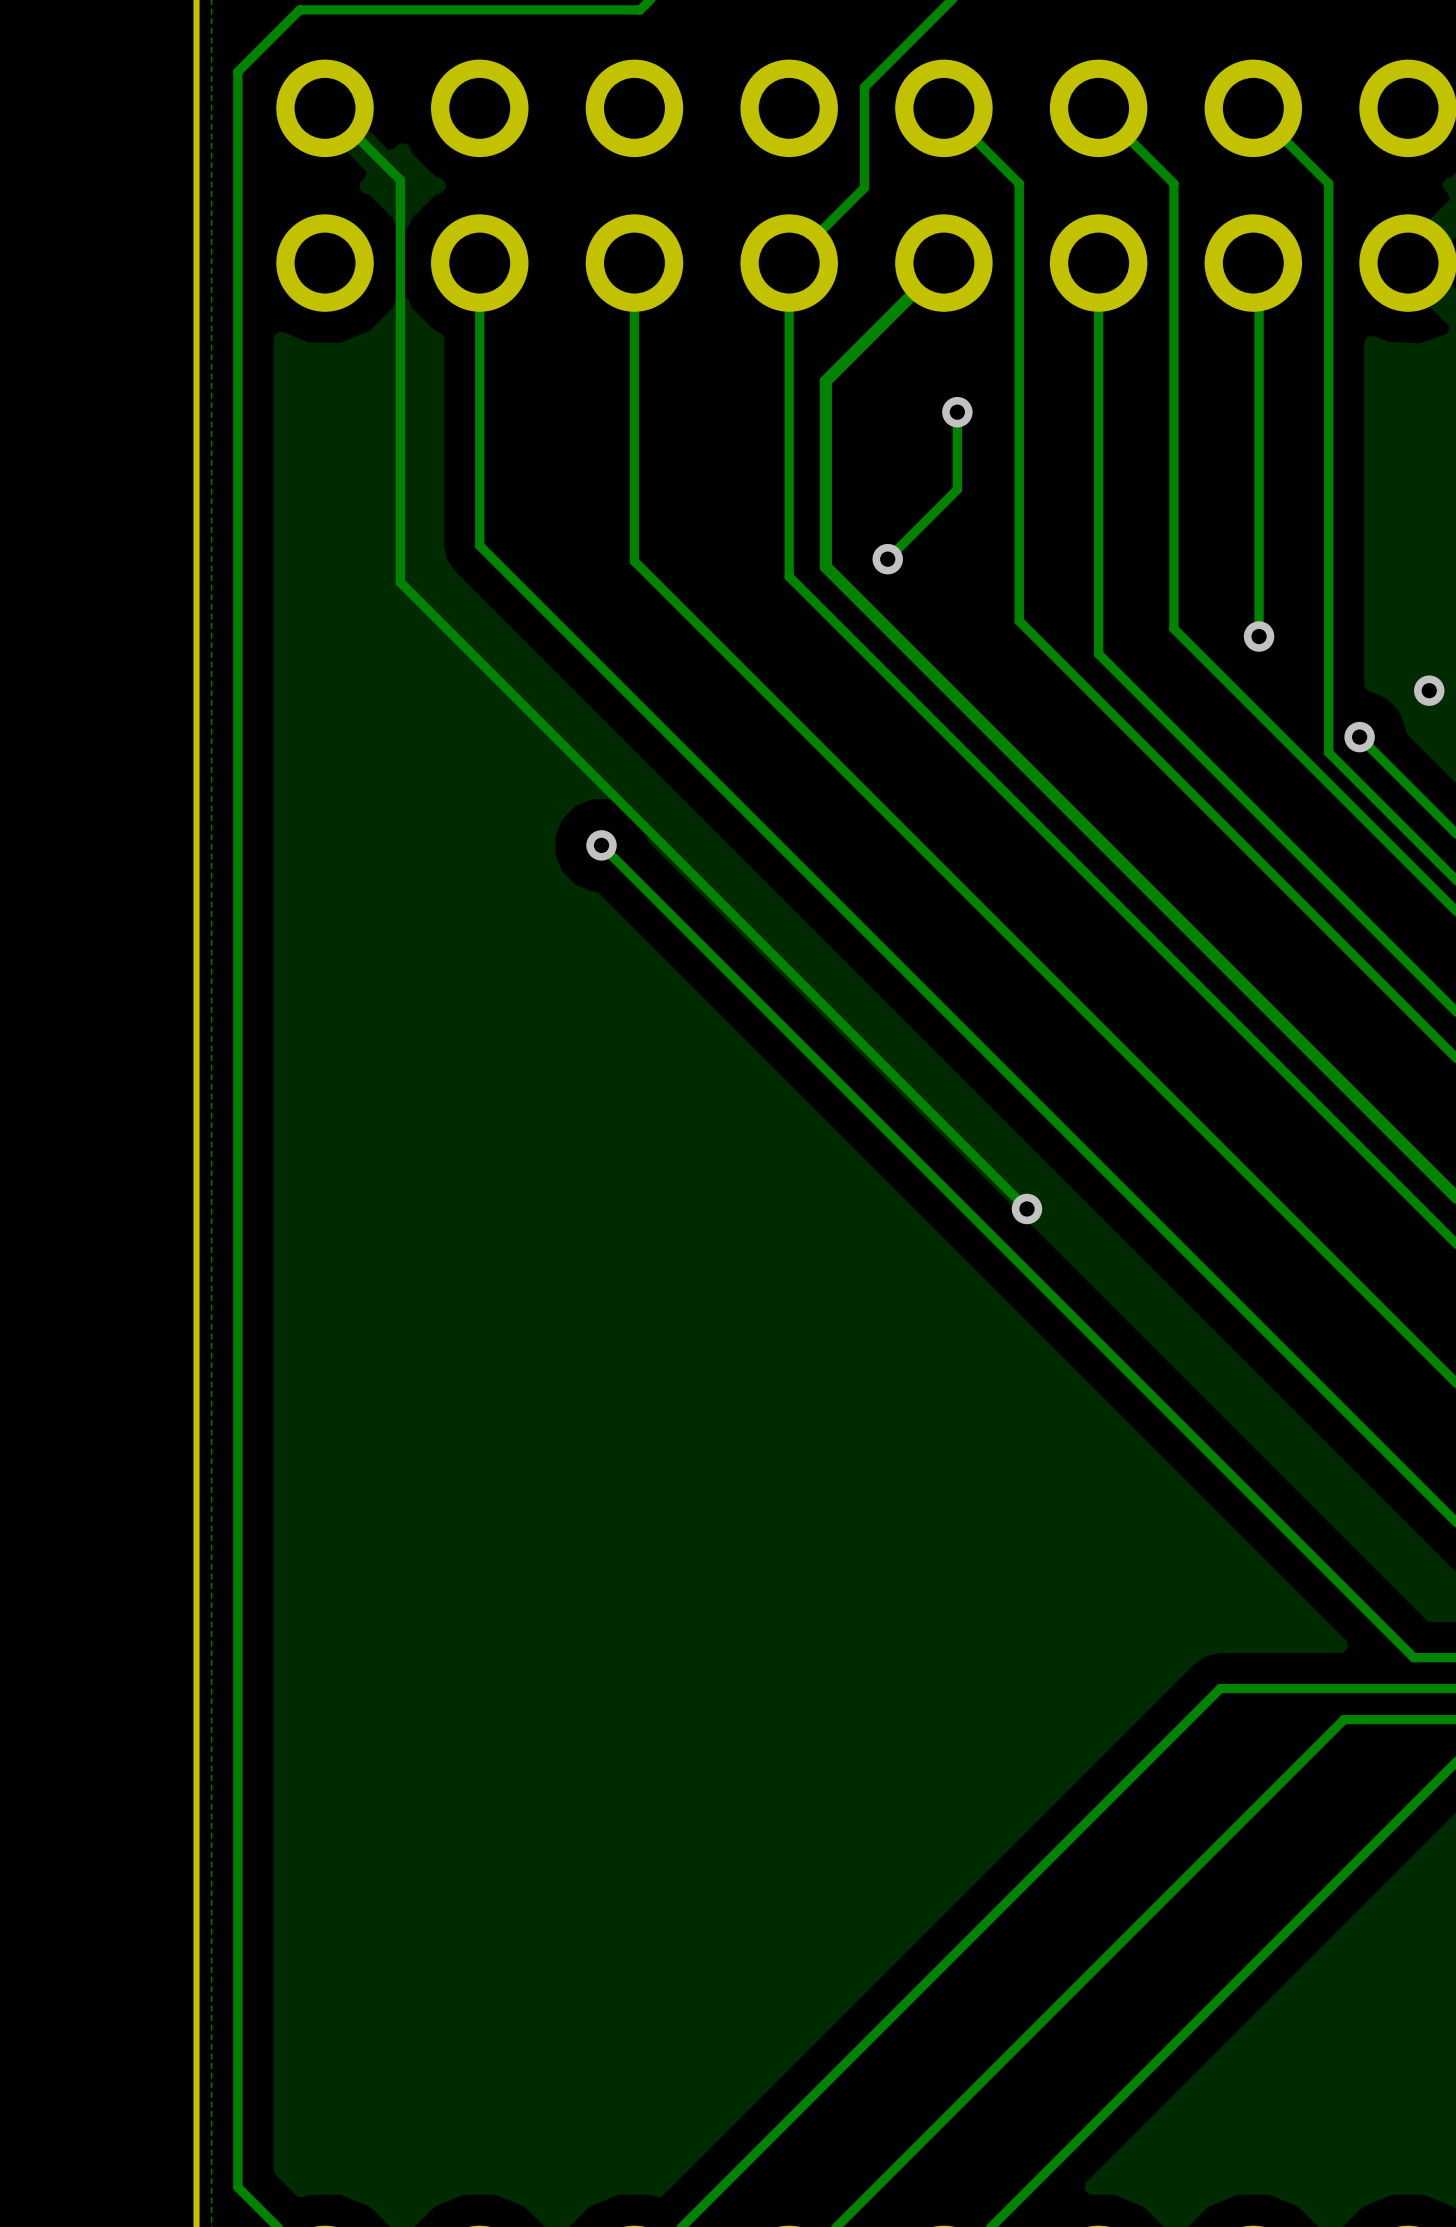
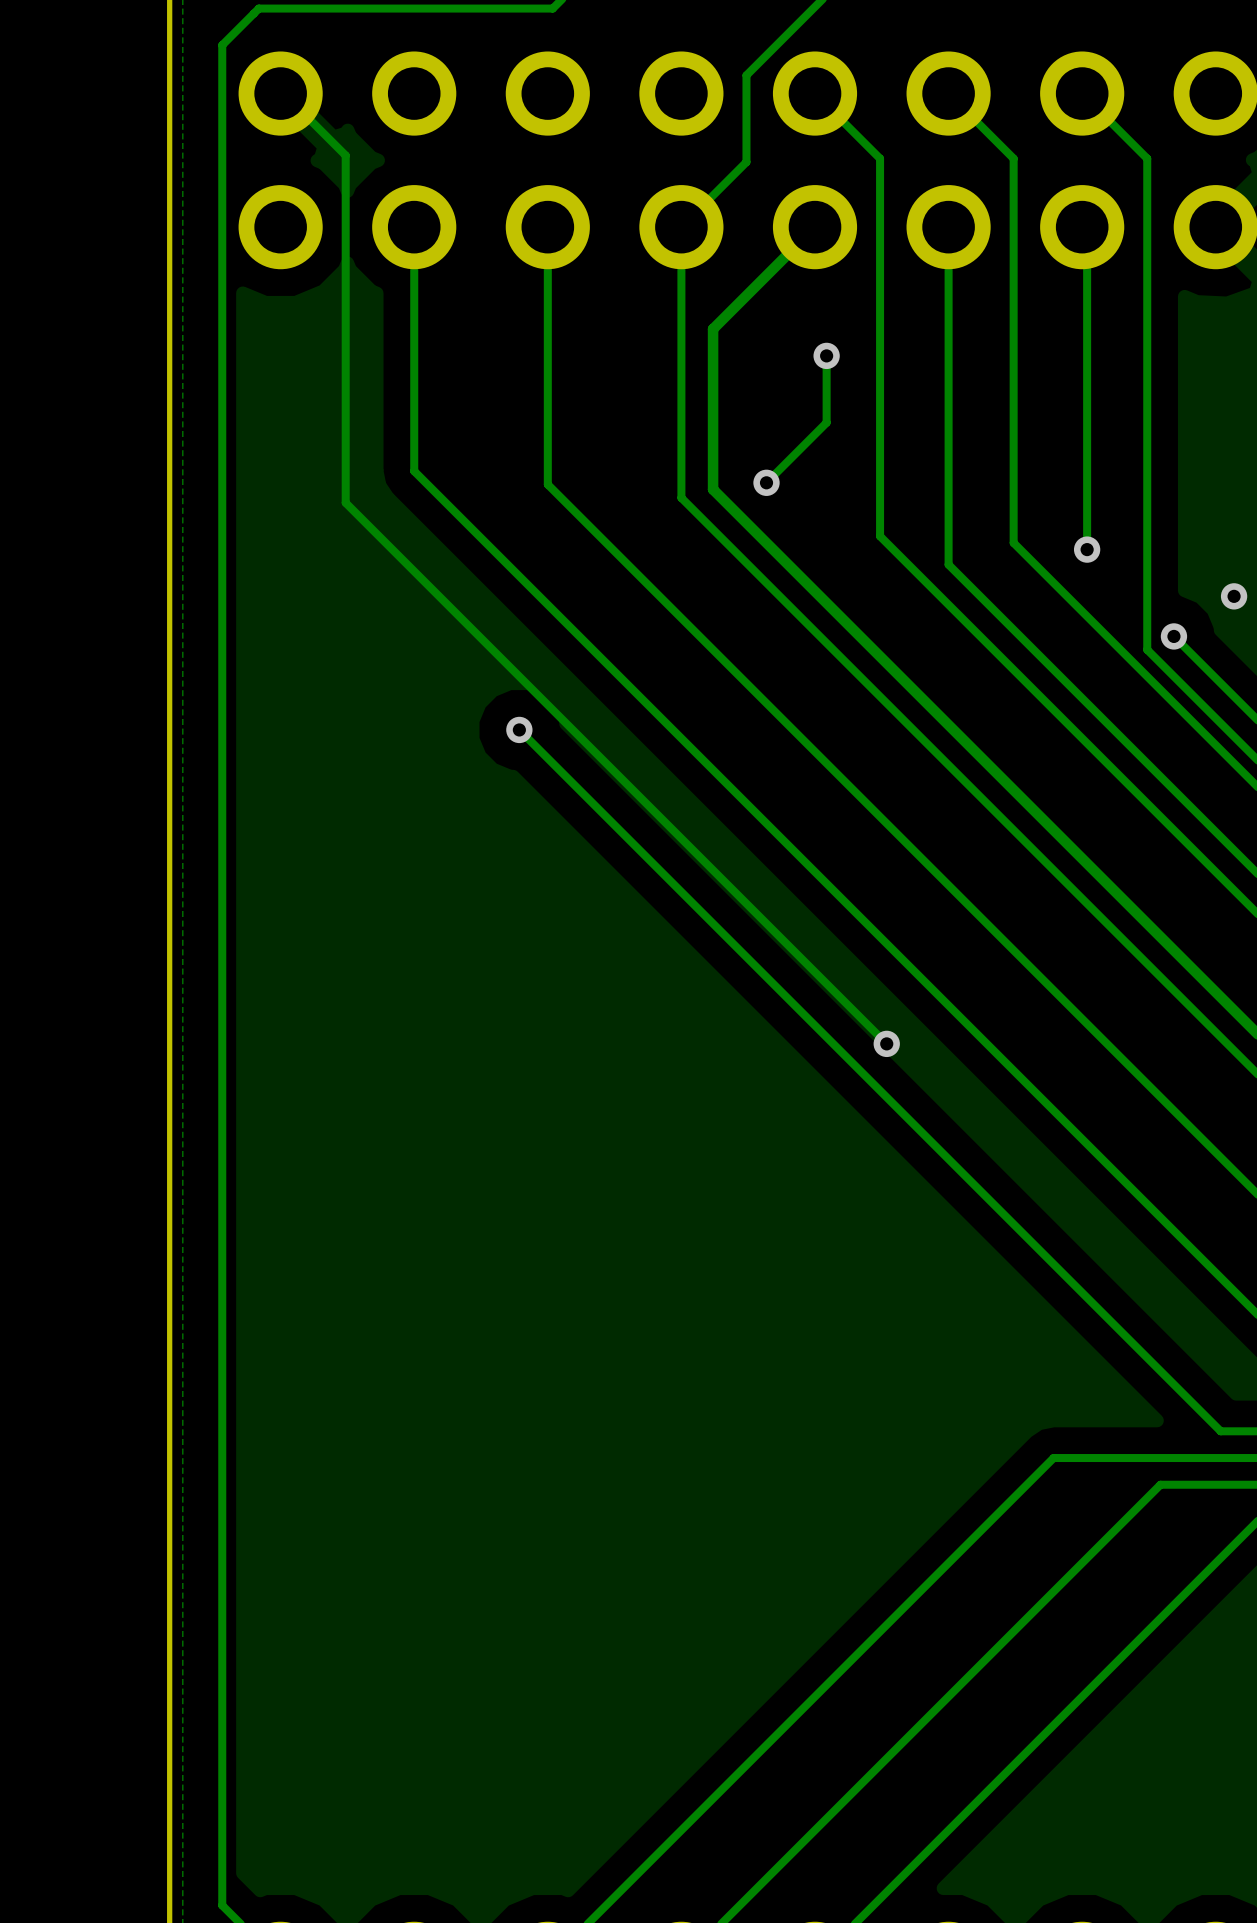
track: (257, 52) (237, 71) (237, 2187) (257, 2206) -> (222, 45) (222, 1905)

